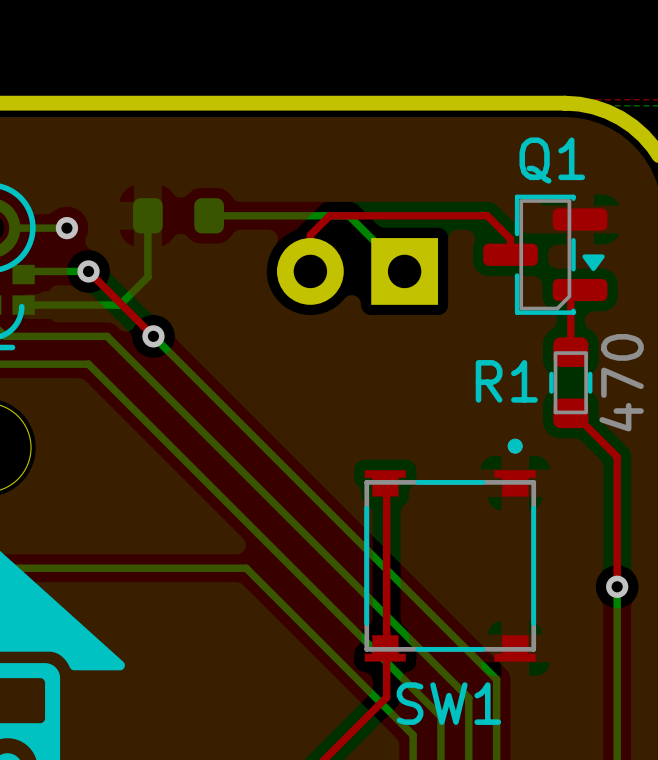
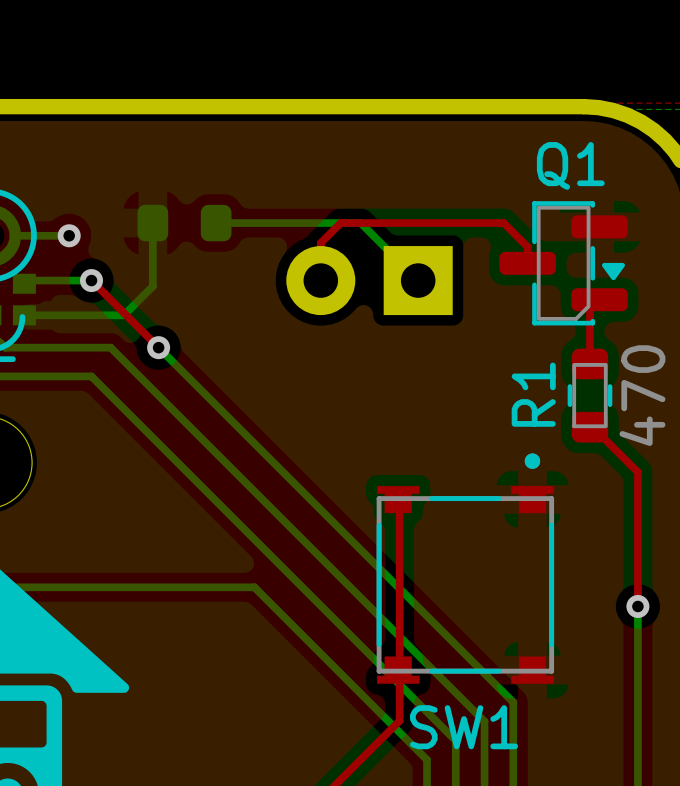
R1 name rotation: 0° (506, 381) -> 90° counterclockwise (533, 394)

